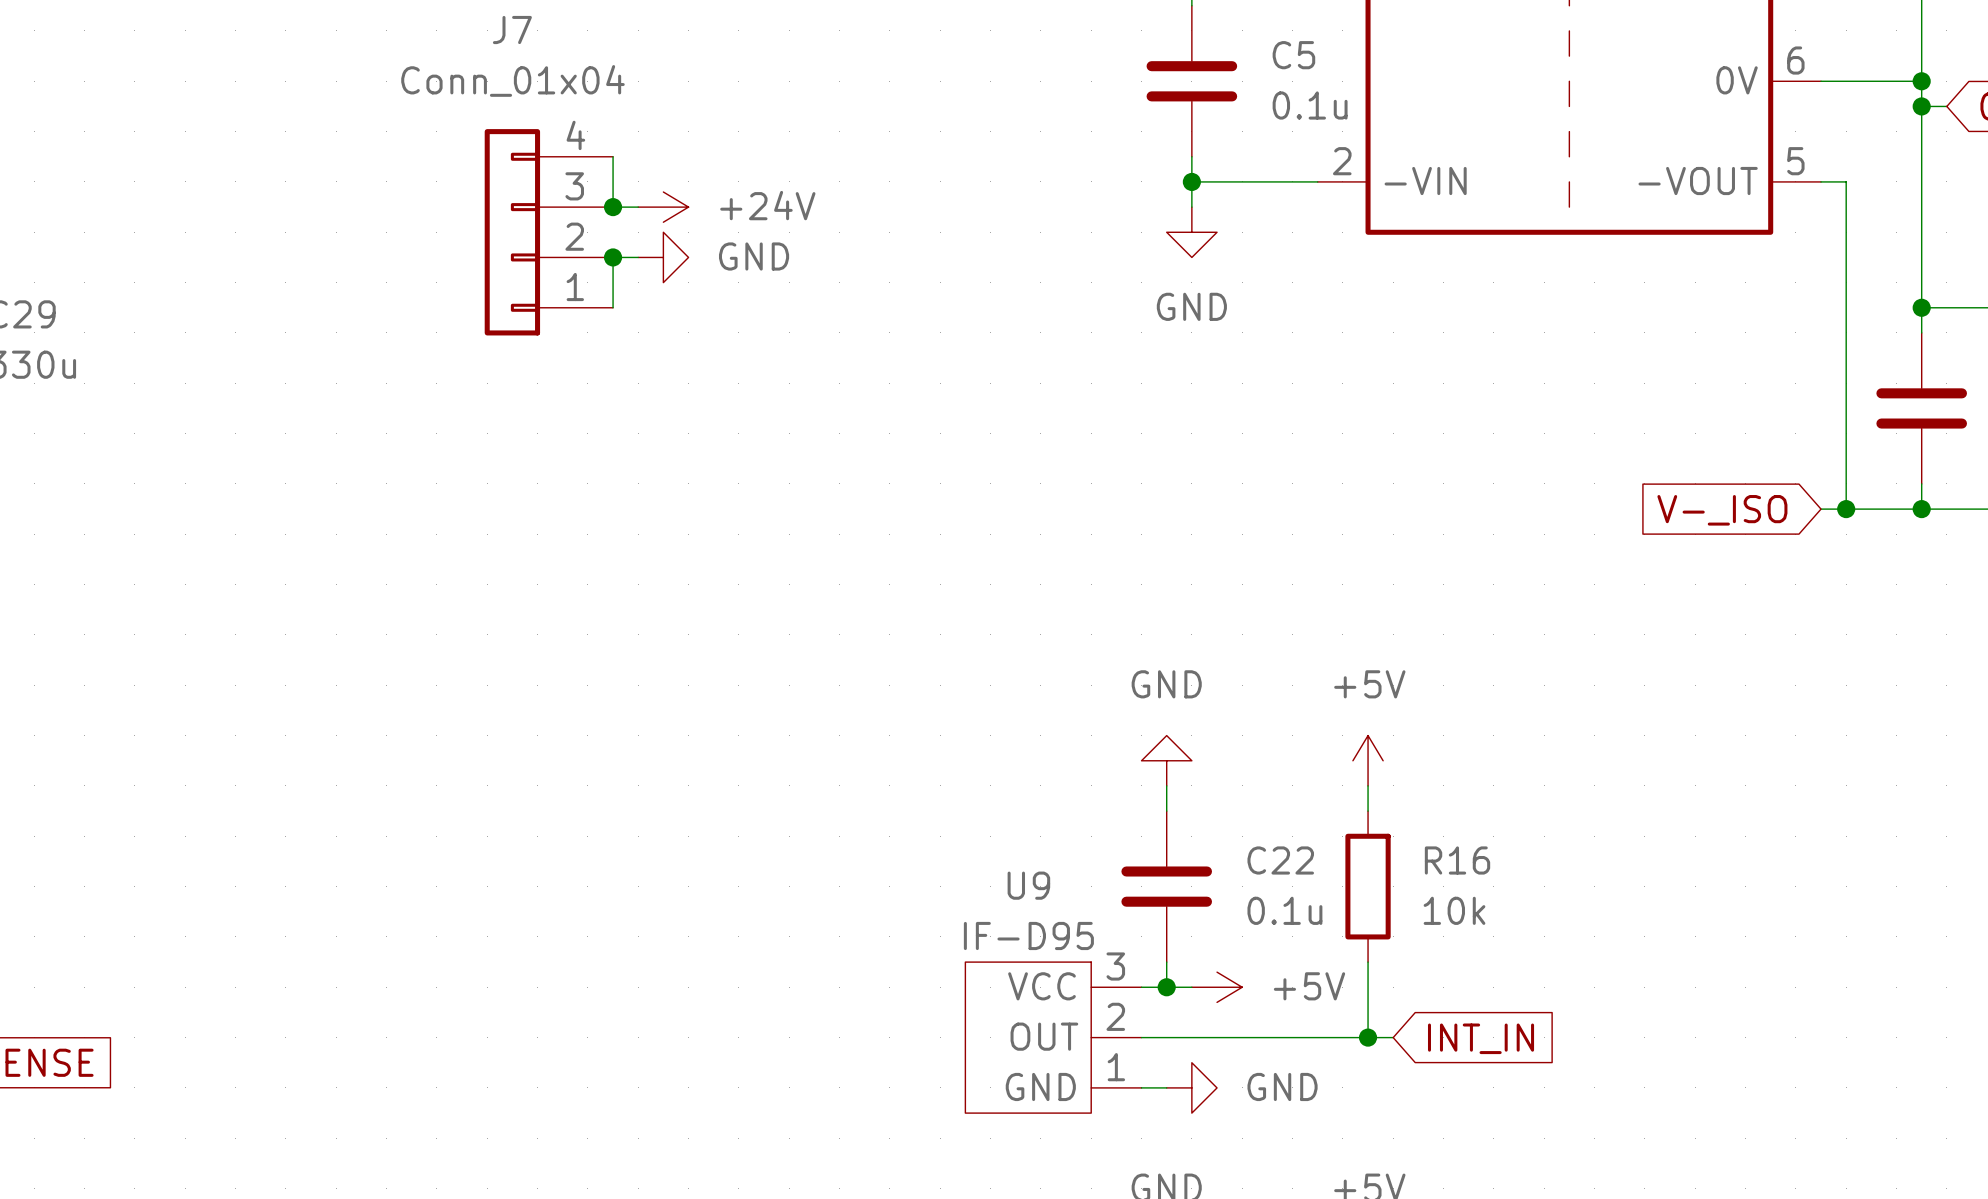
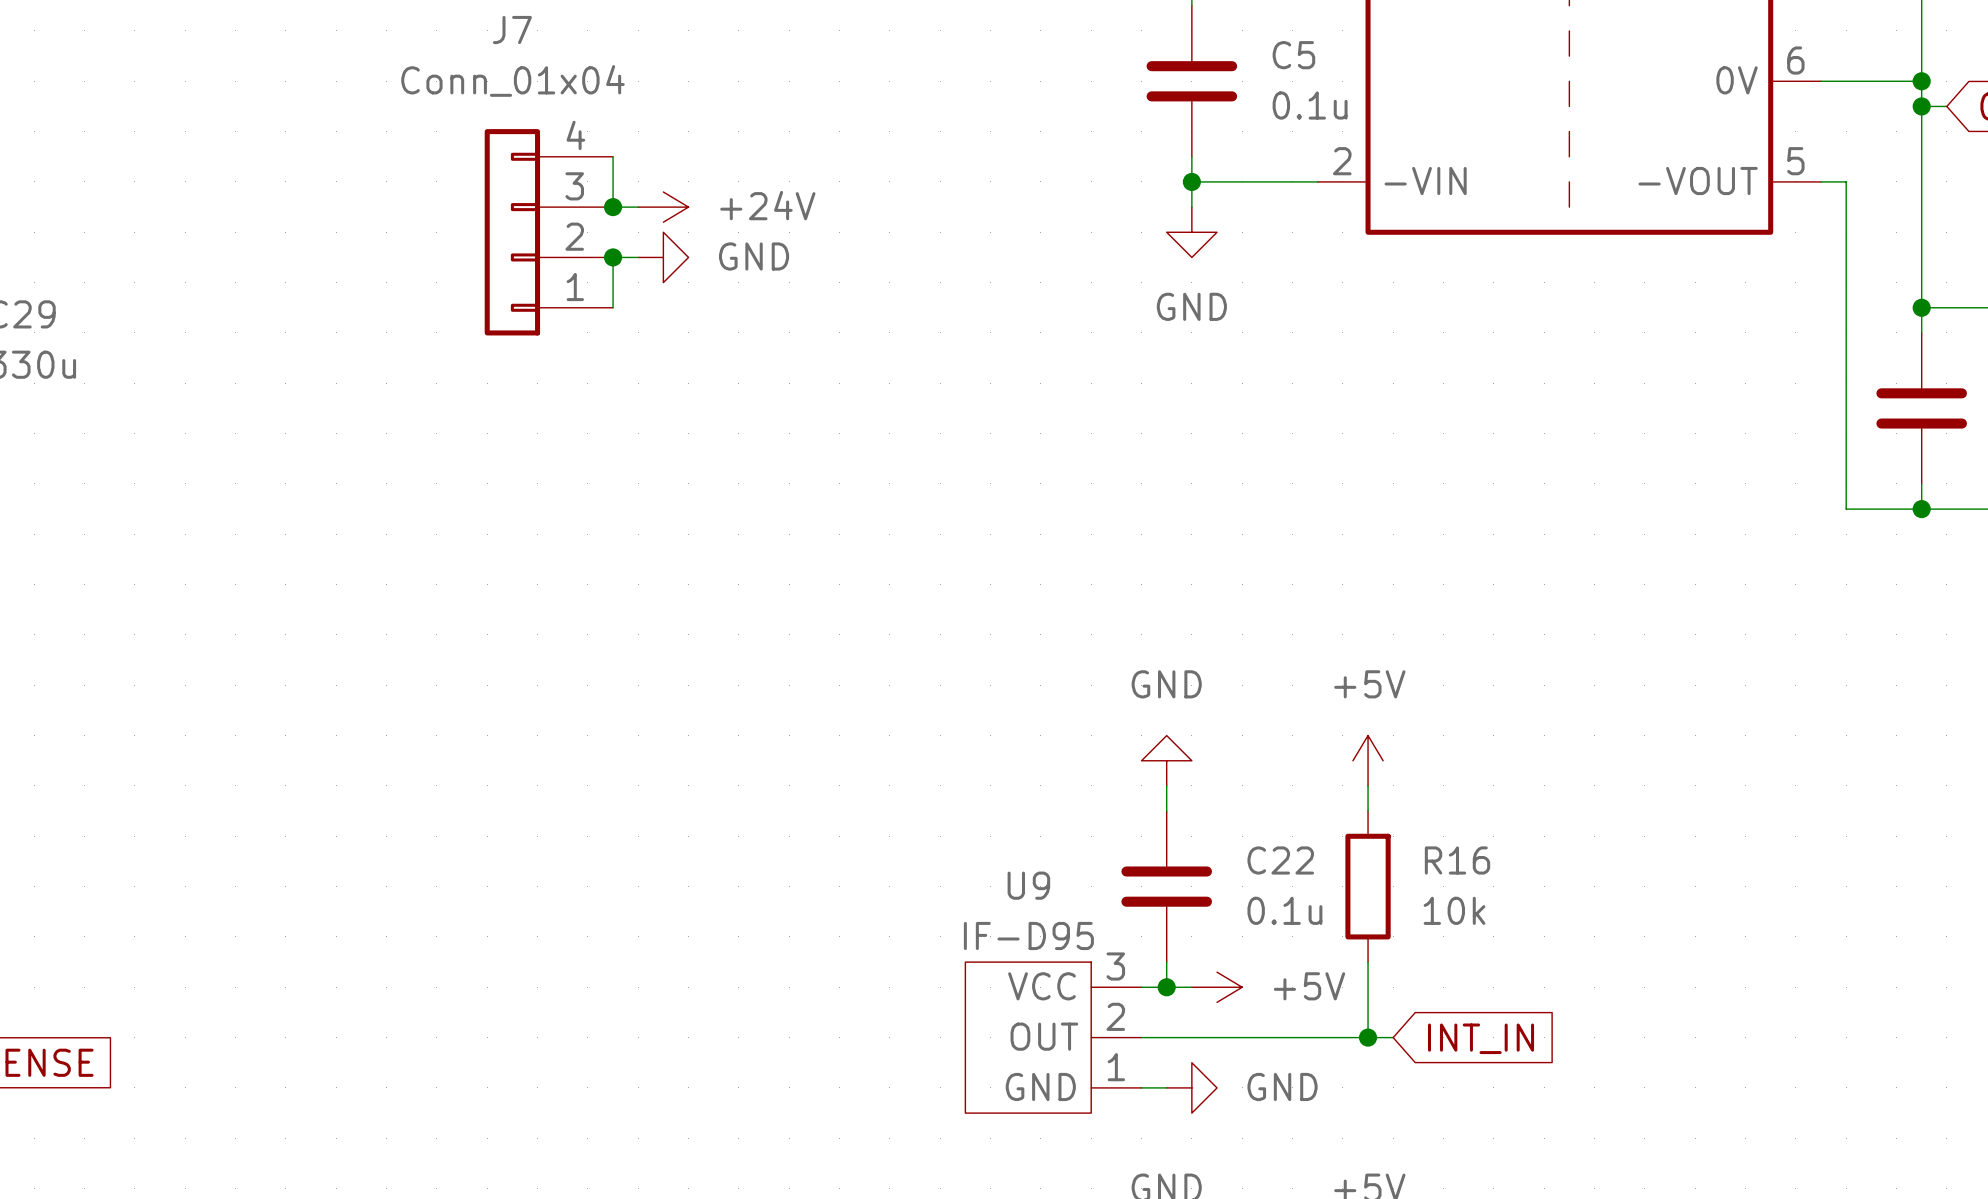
wire: (1821, 509) (1846, 509) -> none
junction: (1846, 509) -> none
global label: V-_ISO (1722, 510) -> none

